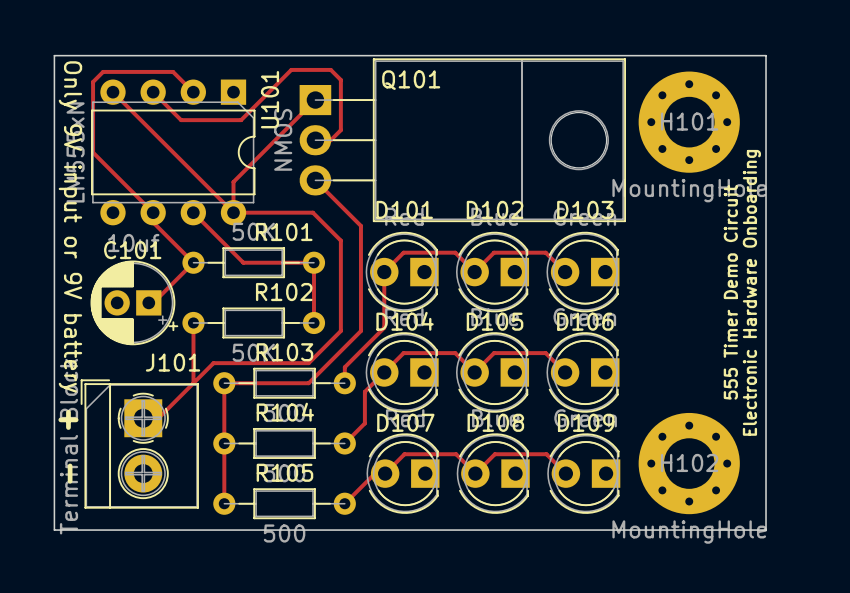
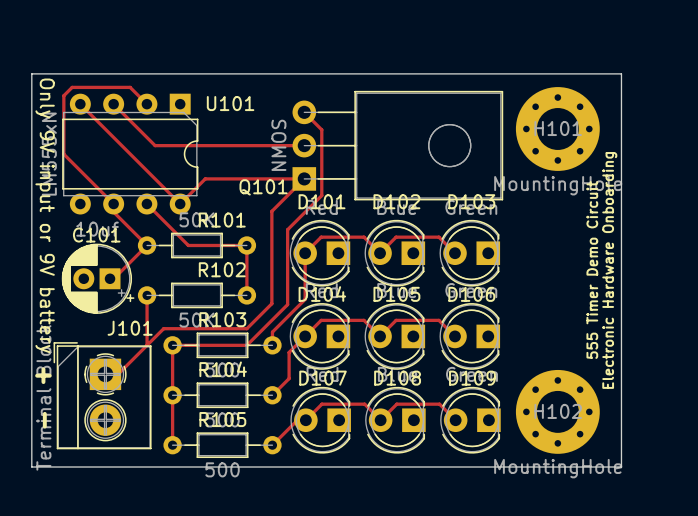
Q101 footprint: [299, 58, 627, 223] -> [292, 90, 504, 201]
Q101 name position: Q101 (411, 80) -> Q101 (263, 187)
U101 name rotation: 0° (270, 99) -> 90° clockwise (230, 103)
top track: (315, 100) (233, 181) (233, 212) (312, 212) (340, 240) (340, 331) (308, 363) -> (180, 204) (205, 178) (304, 178) (271, 211) (271, 303) (246, 328) (242, 328)
top track: (181, 120) (241, 120) (291, 69) (330, 69) (340, 79) (340, 130) (330, 140) (315, 140) -> (136, 127) (155, 145) (304, 145)
Q101 value position: NMOS (283, 139) -> NMOS (278, 145)
top track: (315, 180) (360, 225) (360, 331) (308, 383) -> (304, 112) (321, 129) (321, 195) (287, 229) (287, 304) (246, 345) (242, 345)

